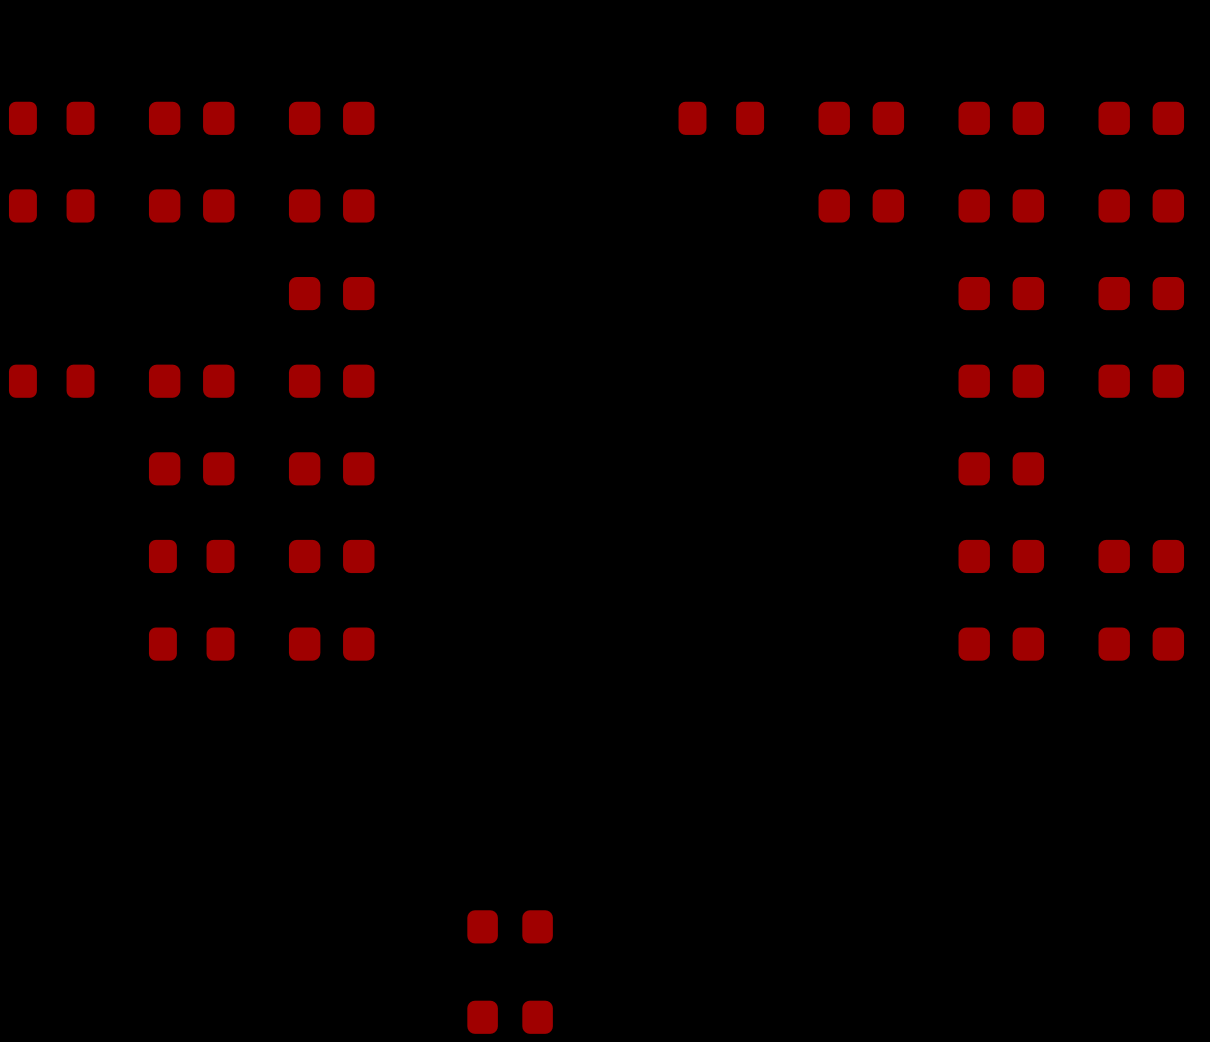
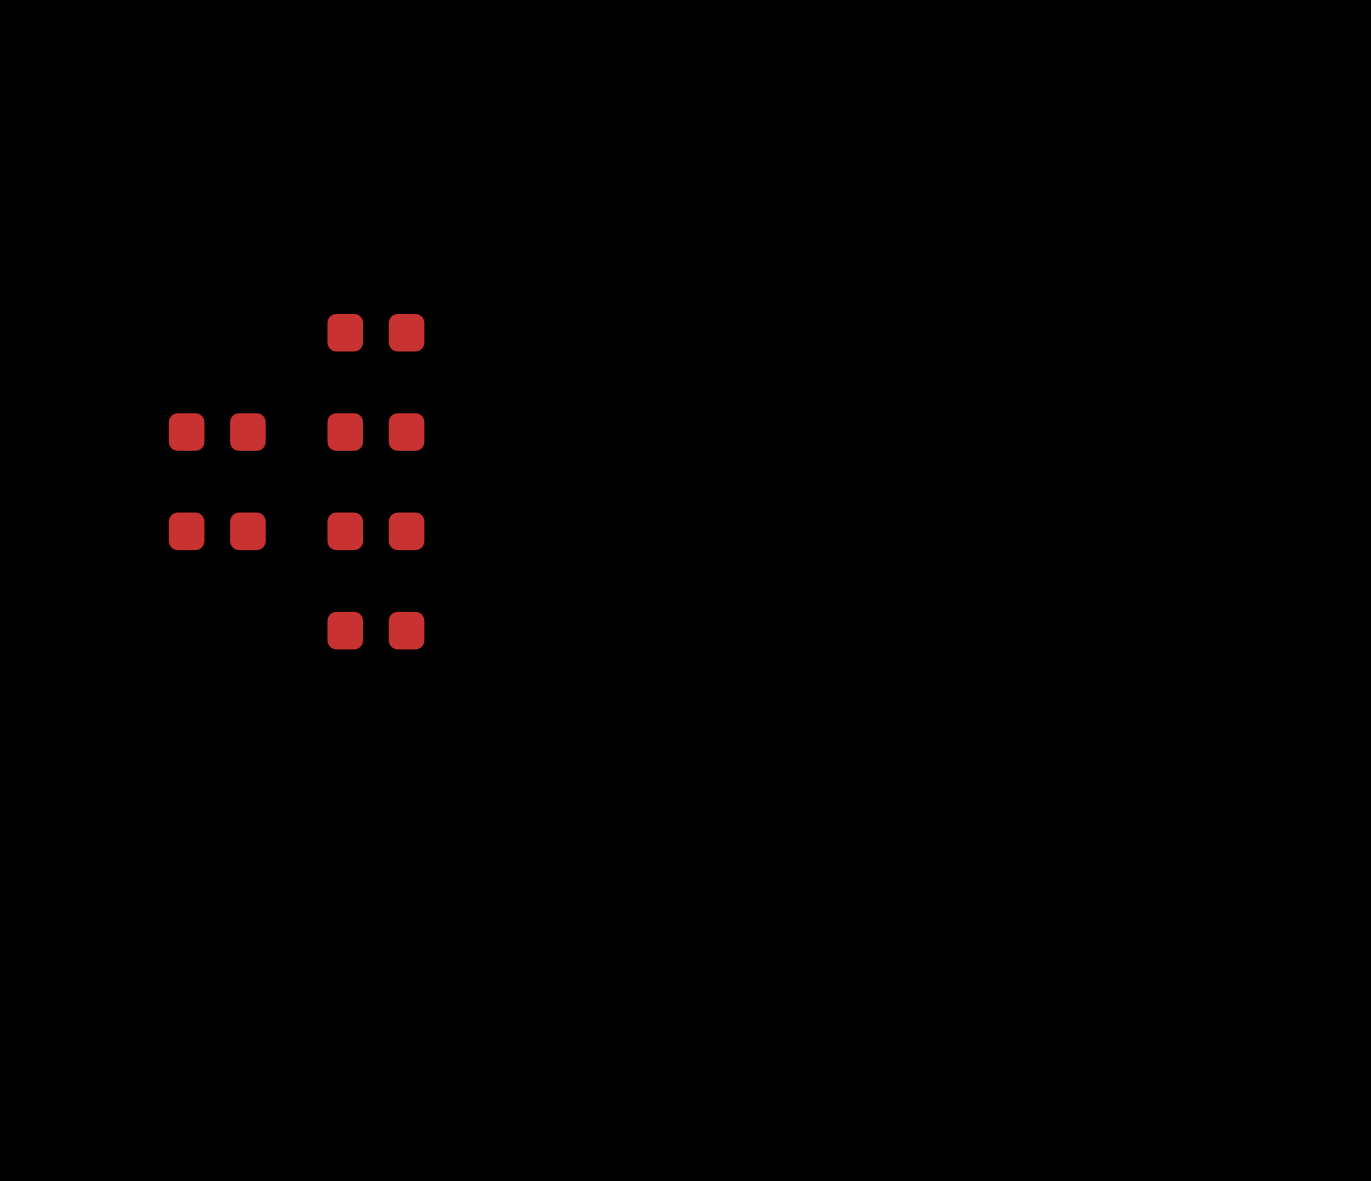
part: (51, 118) -> none
part: (191, 118) -> none
part: (331, 118) -> none
part: (721, 118) -> none
part: (861, 118) -> none
part: (1001, 118) -> none
part: (1141, 118) -> none
part: (51, 205) -> none
part: (191, 205) -> none
part: (331, 205) -> none
part: (861, 205) -> none
part: (1001, 205) -> none
part: (1141, 205) -> none
part: (1001, 293) -> none
part: (1141, 293) -> none
part: (51, 381) -> none
part: (1001, 381) -> none
part: (1141, 381) -> none
part: (1001, 468) -> none
part: (191, 556) -> none
part: (1001, 556) -> none
part: (1141, 556) -> none
part: (191, 644) -> none
part: (331, 644) -> none
part: (1001, 644) -> none
part: (1141, 644) -> none
part: (510, 926) -> none
part: (510, 1017) -> none

